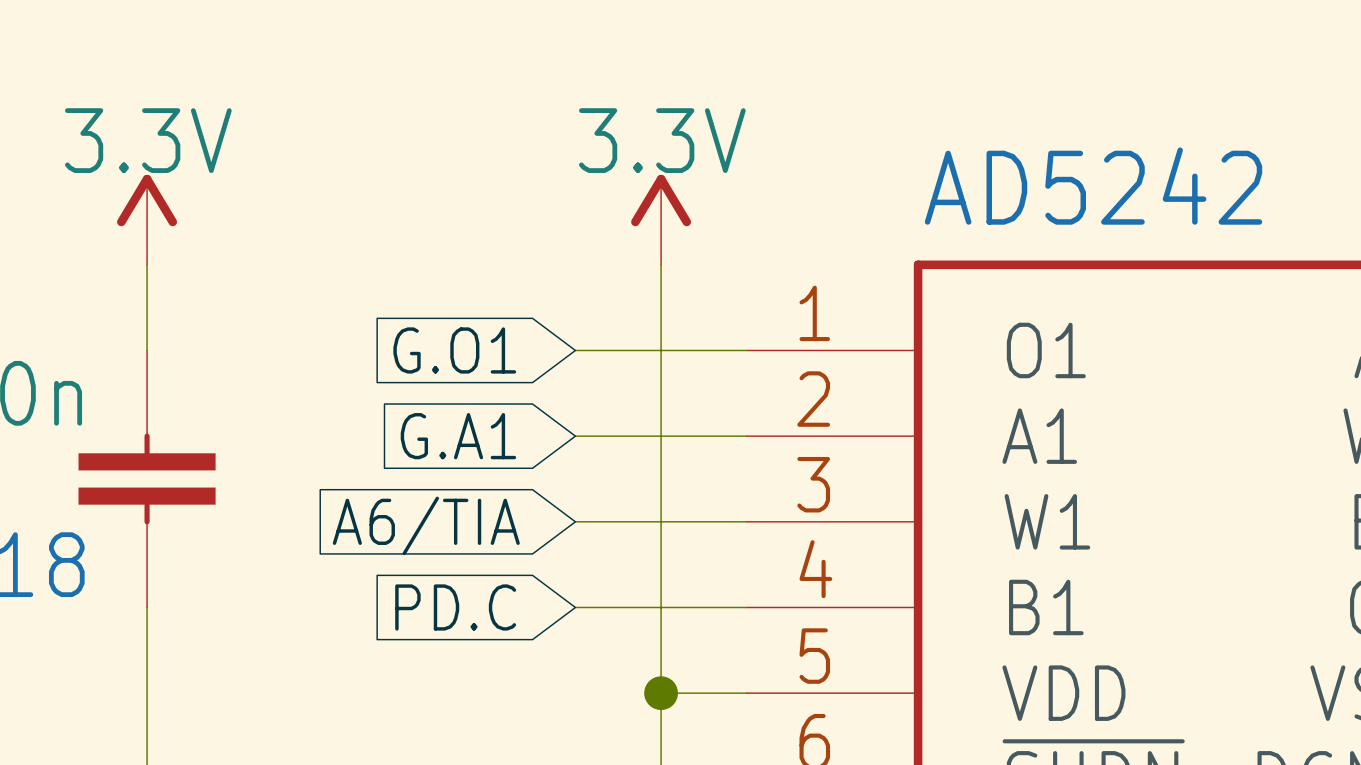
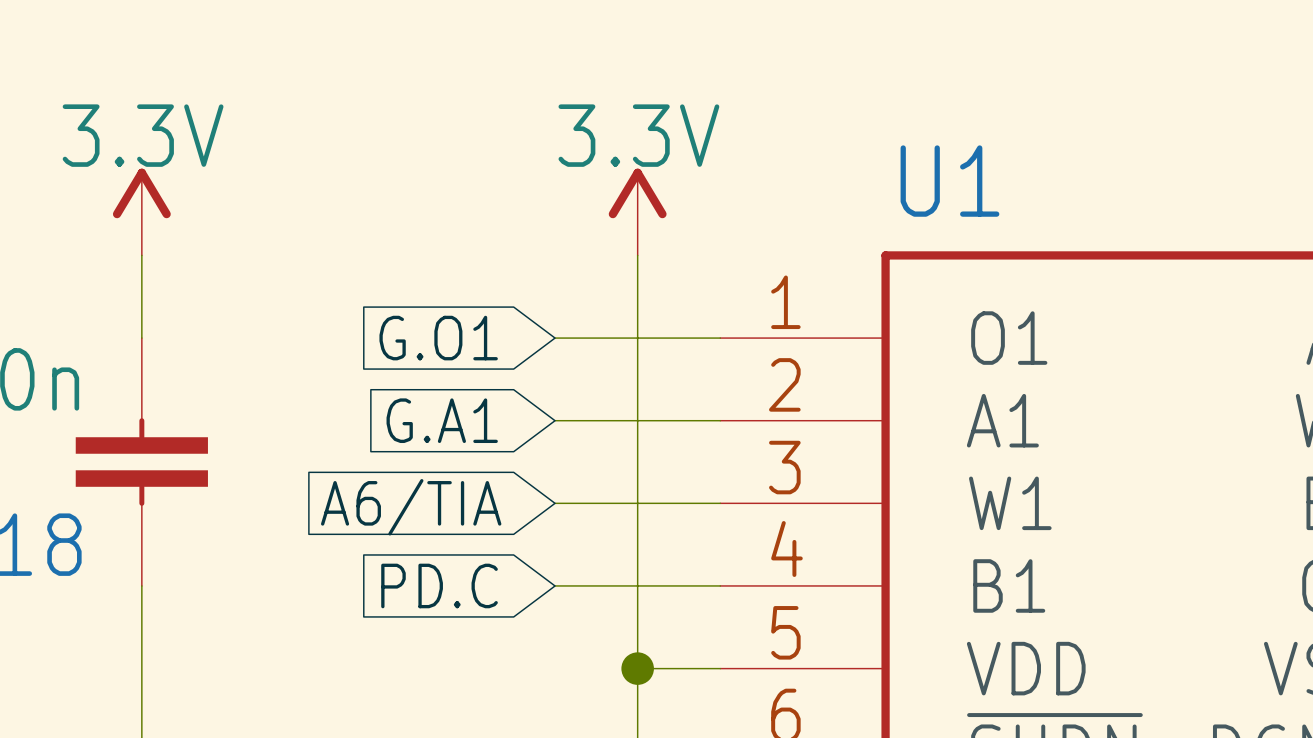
AD5242 name: AD5242 (1093, 186) -> U1 (949, 181)

